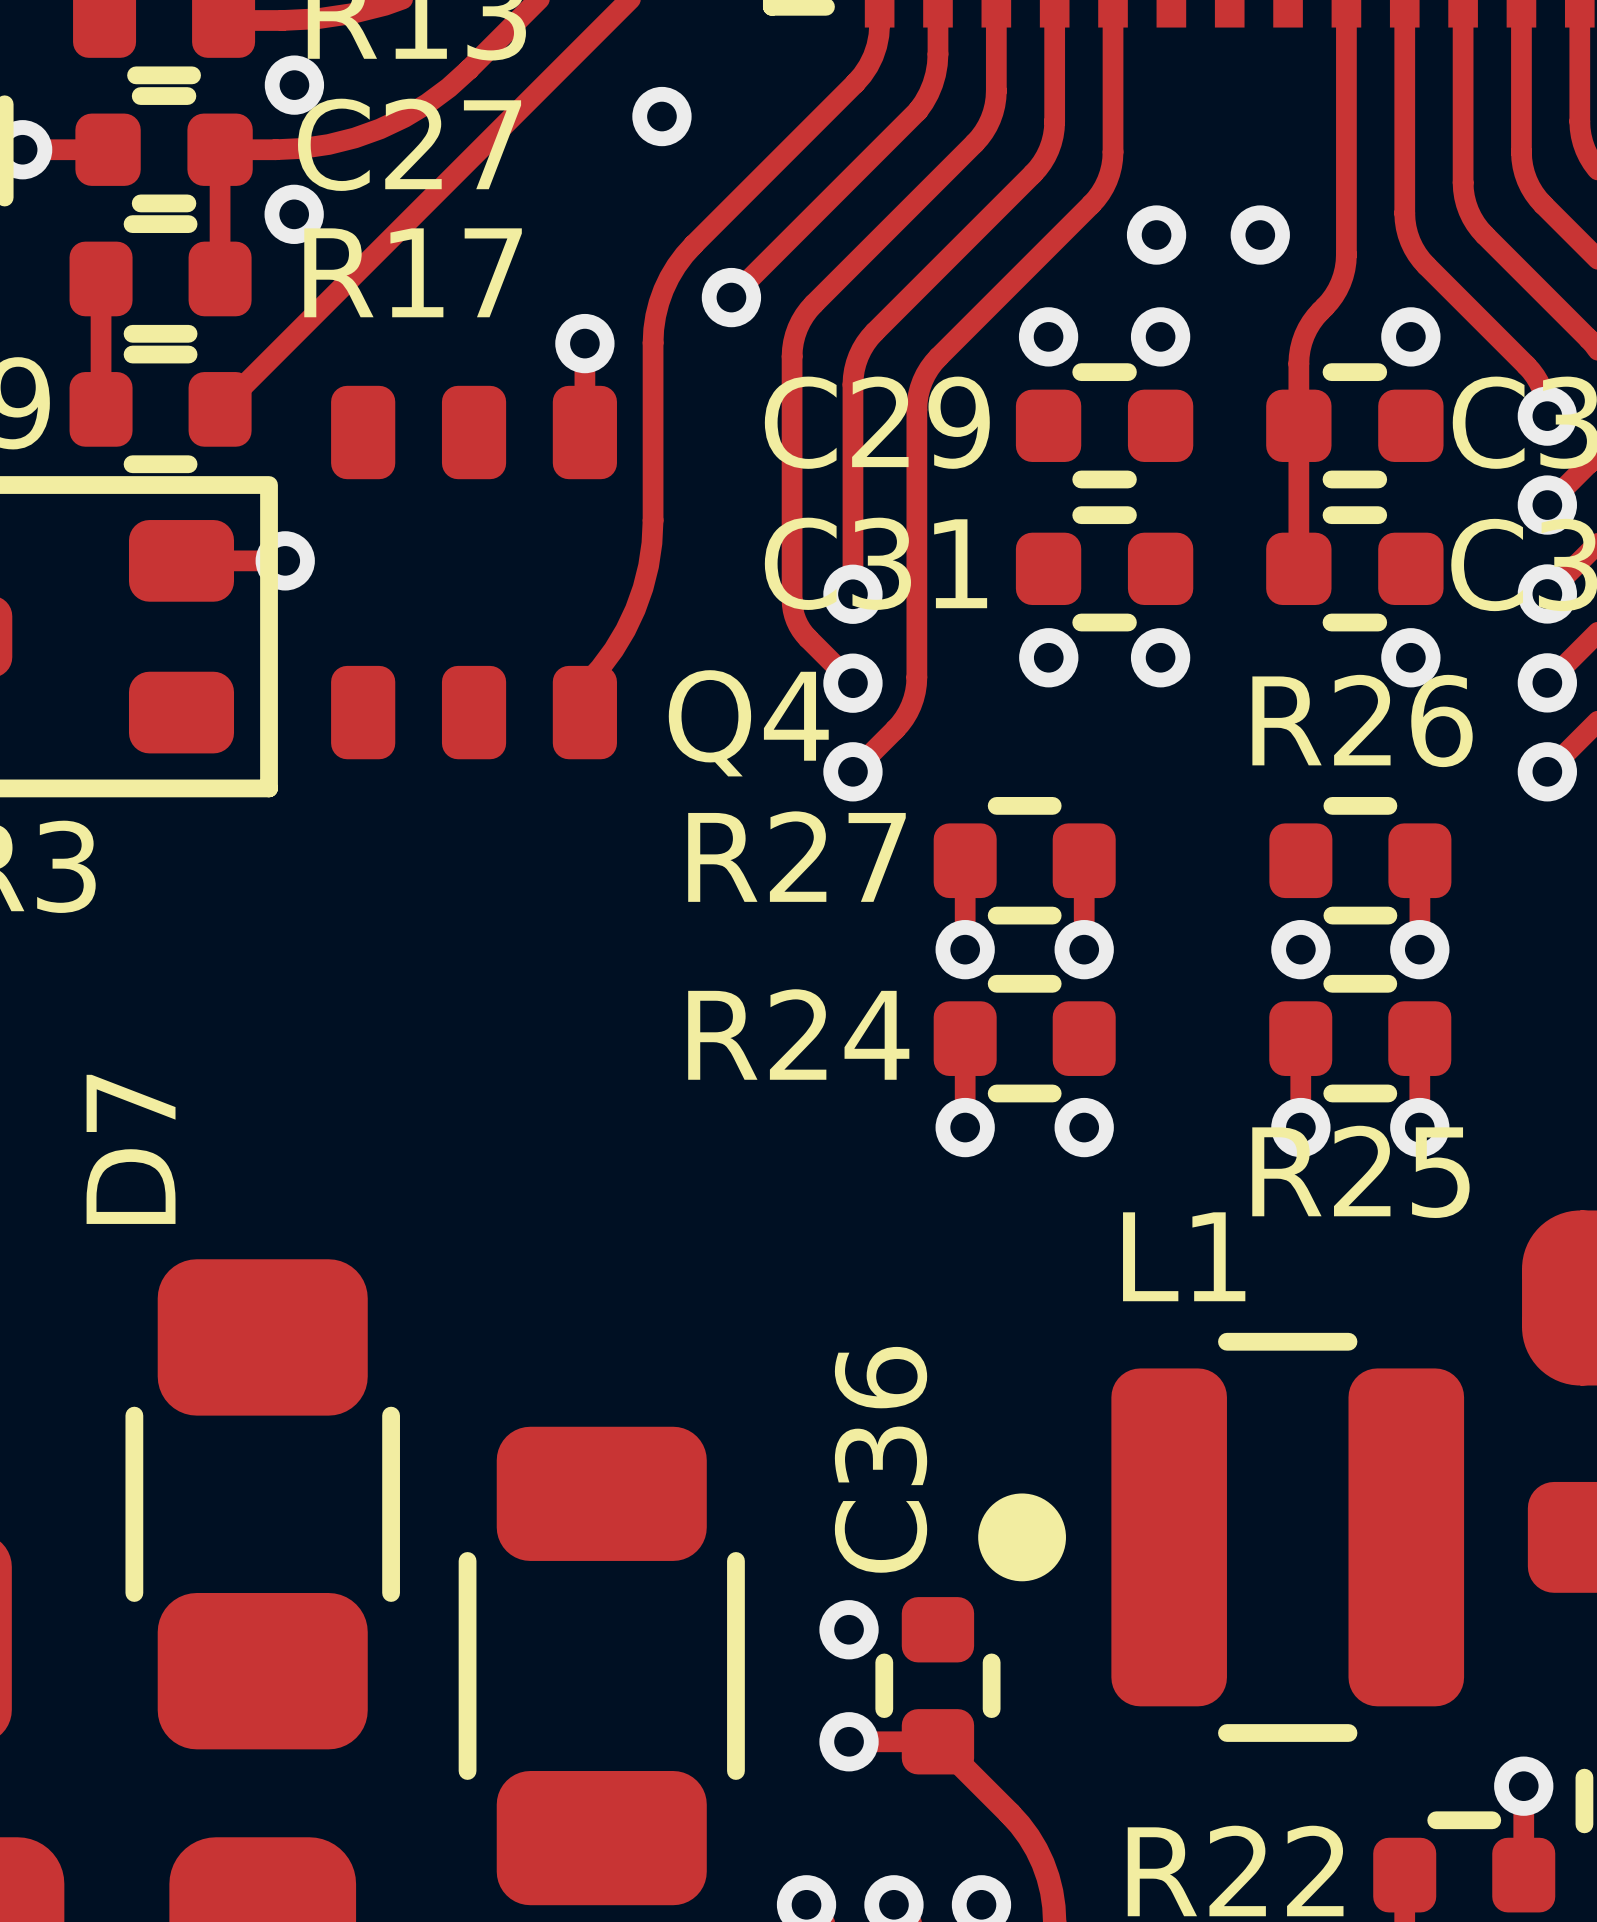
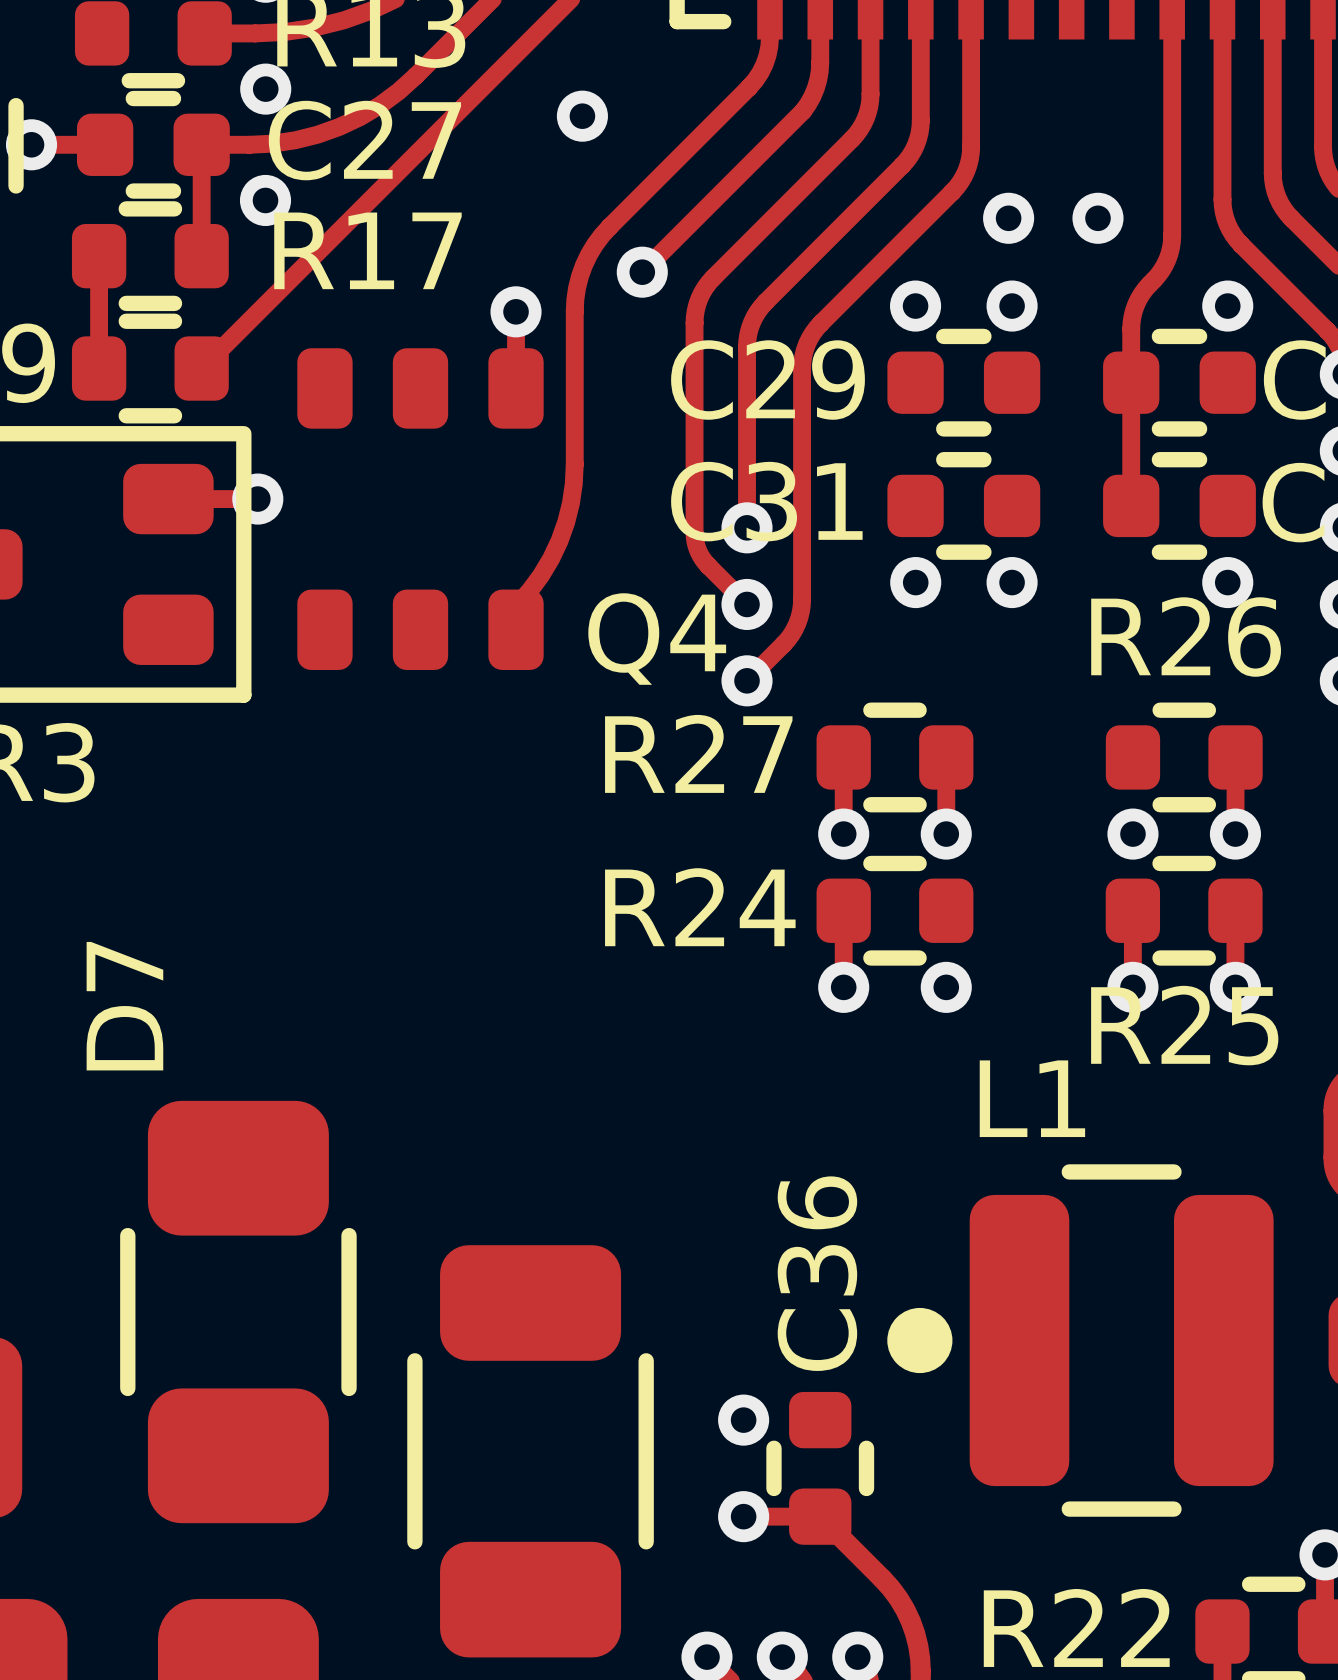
L1 footprint: [978, 1332, 1465, 1742] -> [887, 1164, 1274, 1517]
C36 name position: C36 (881, 1459) -> C36 (817, 1273)

